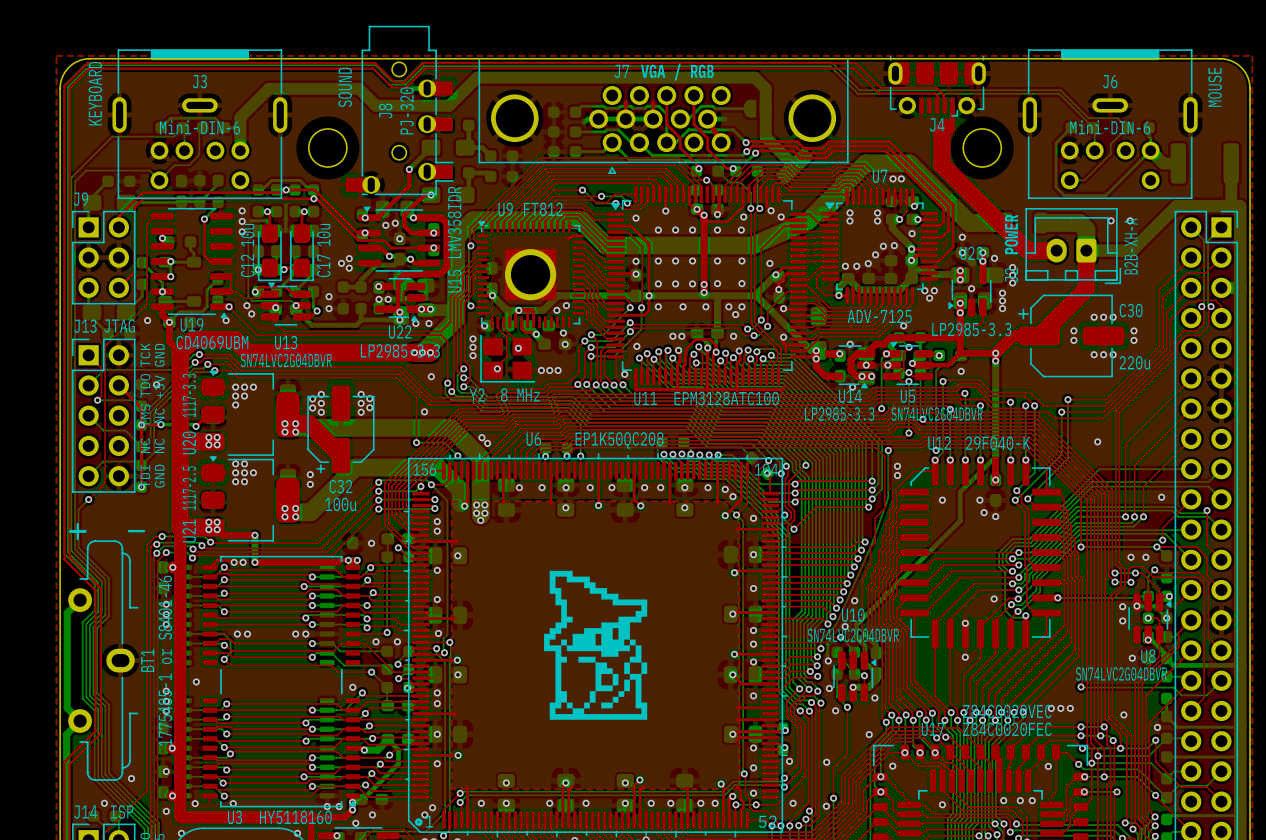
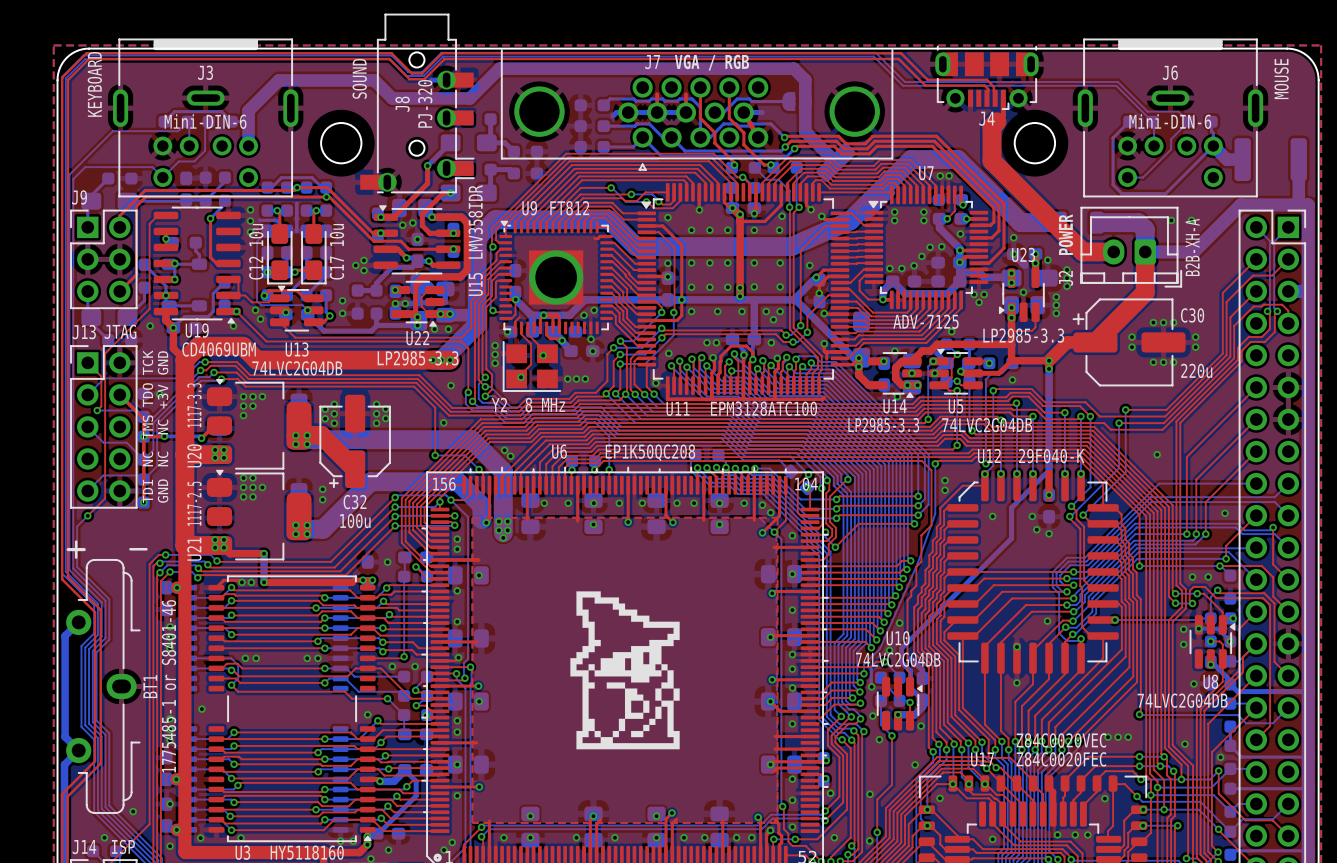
U13 text: SN74LVC2G04DBVR (286, 360) -> 74LVC2G04DB (297, 368)
U5 text: SN74LVC2G04DBVR (937, 414) -> 74LVC2G04DB (987, 425)
U10 text: SN74LVC2G04DBVR (853, 635) -> 74LVC2G04DB (898, 659)
U8 text: SN74LVC2G04DBVR (1121, 674) -> 74LVC2G04DB (1182, 700)

